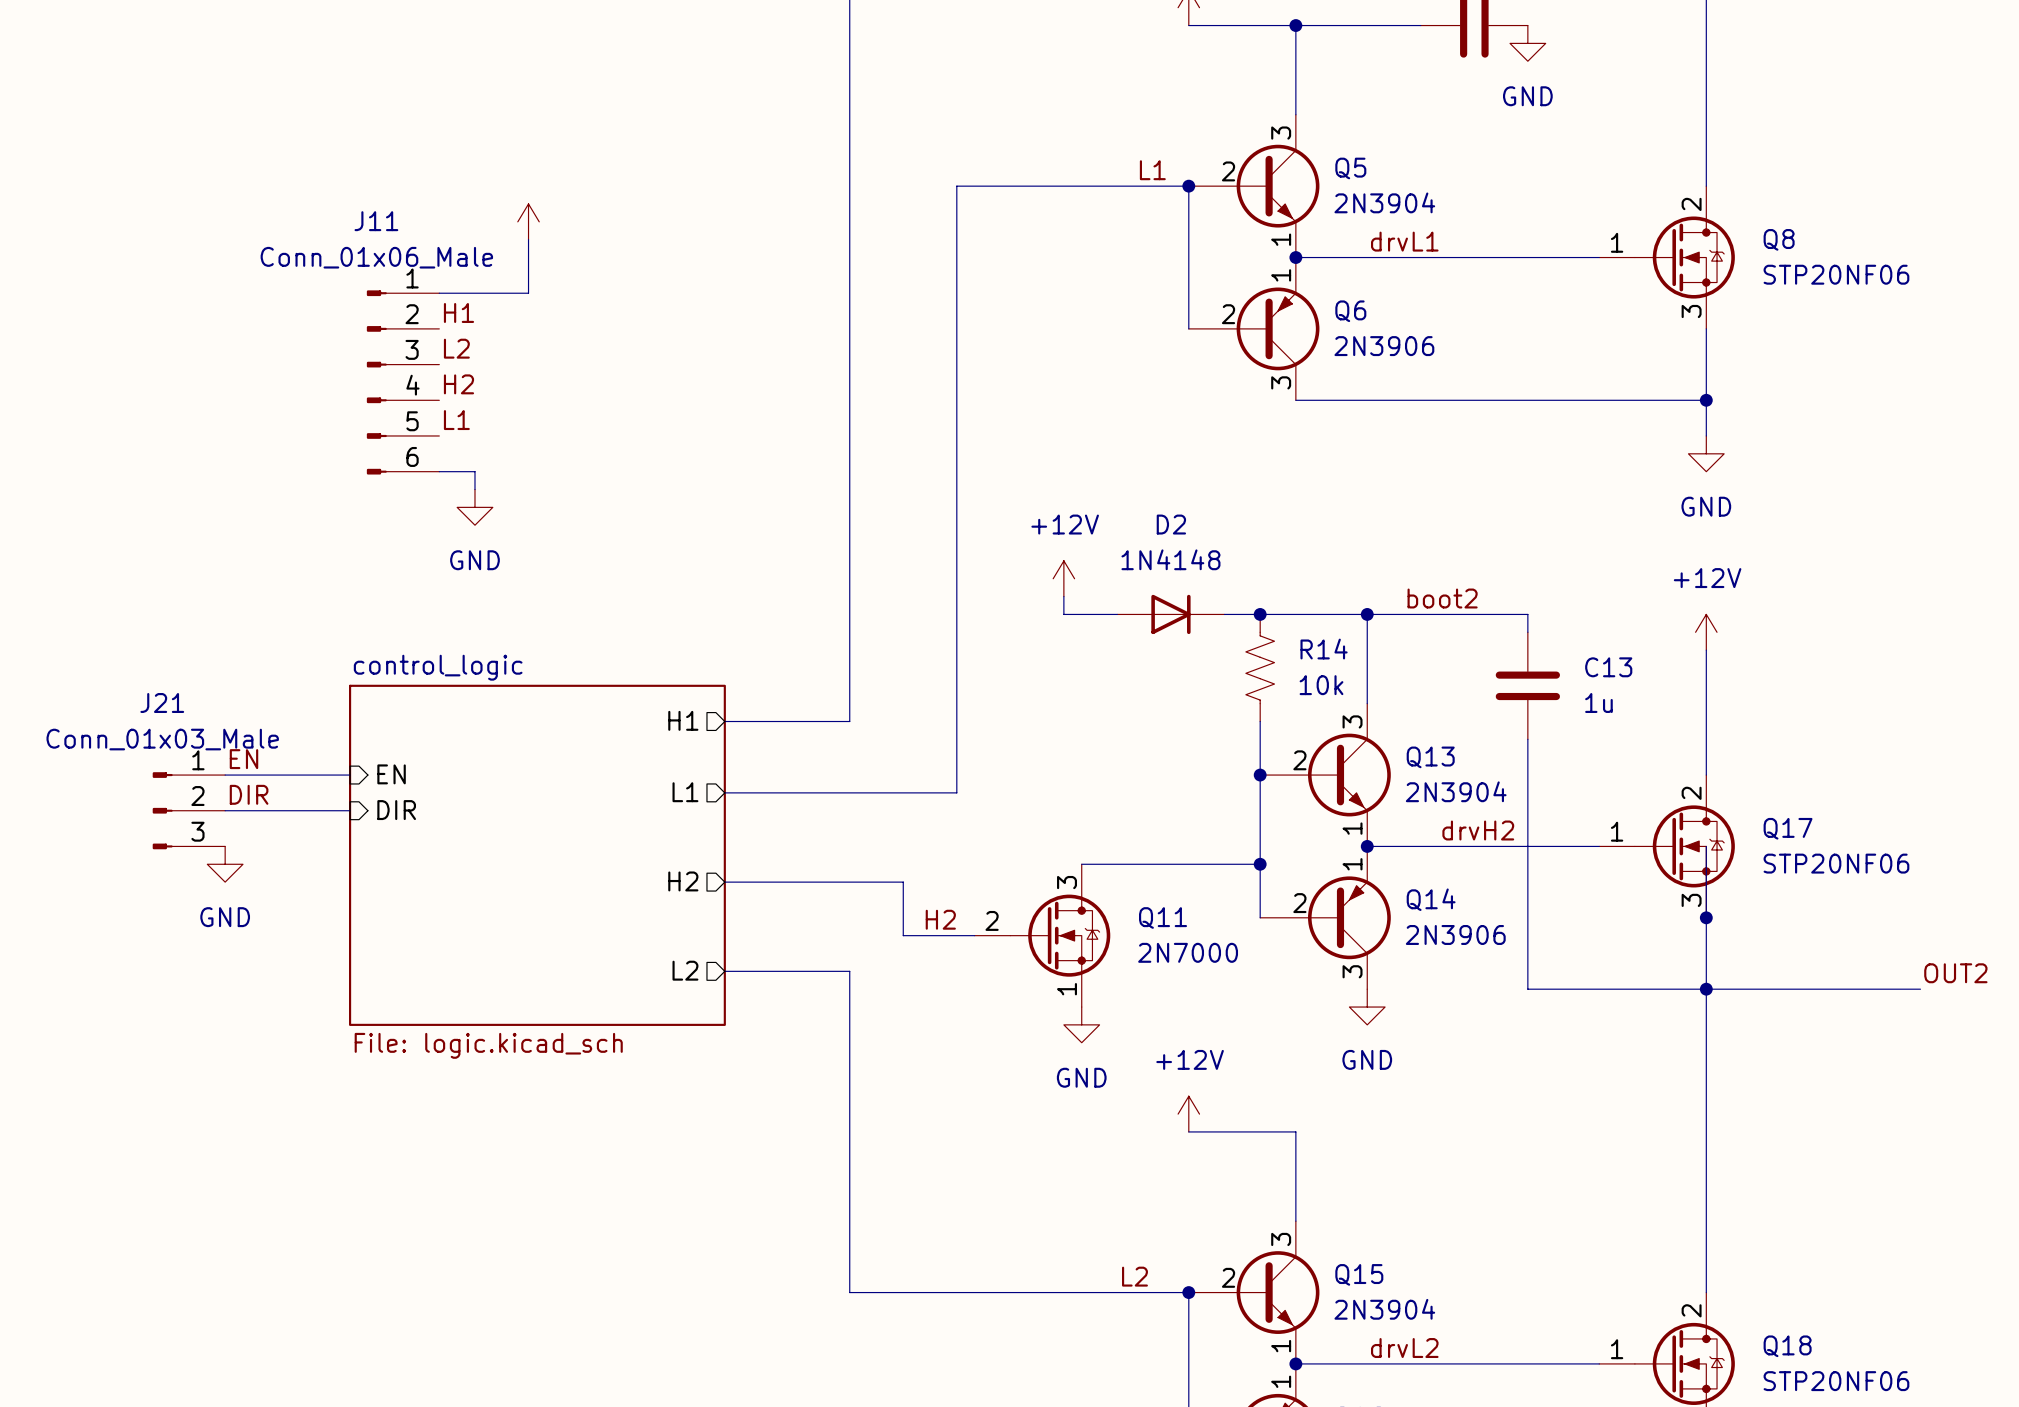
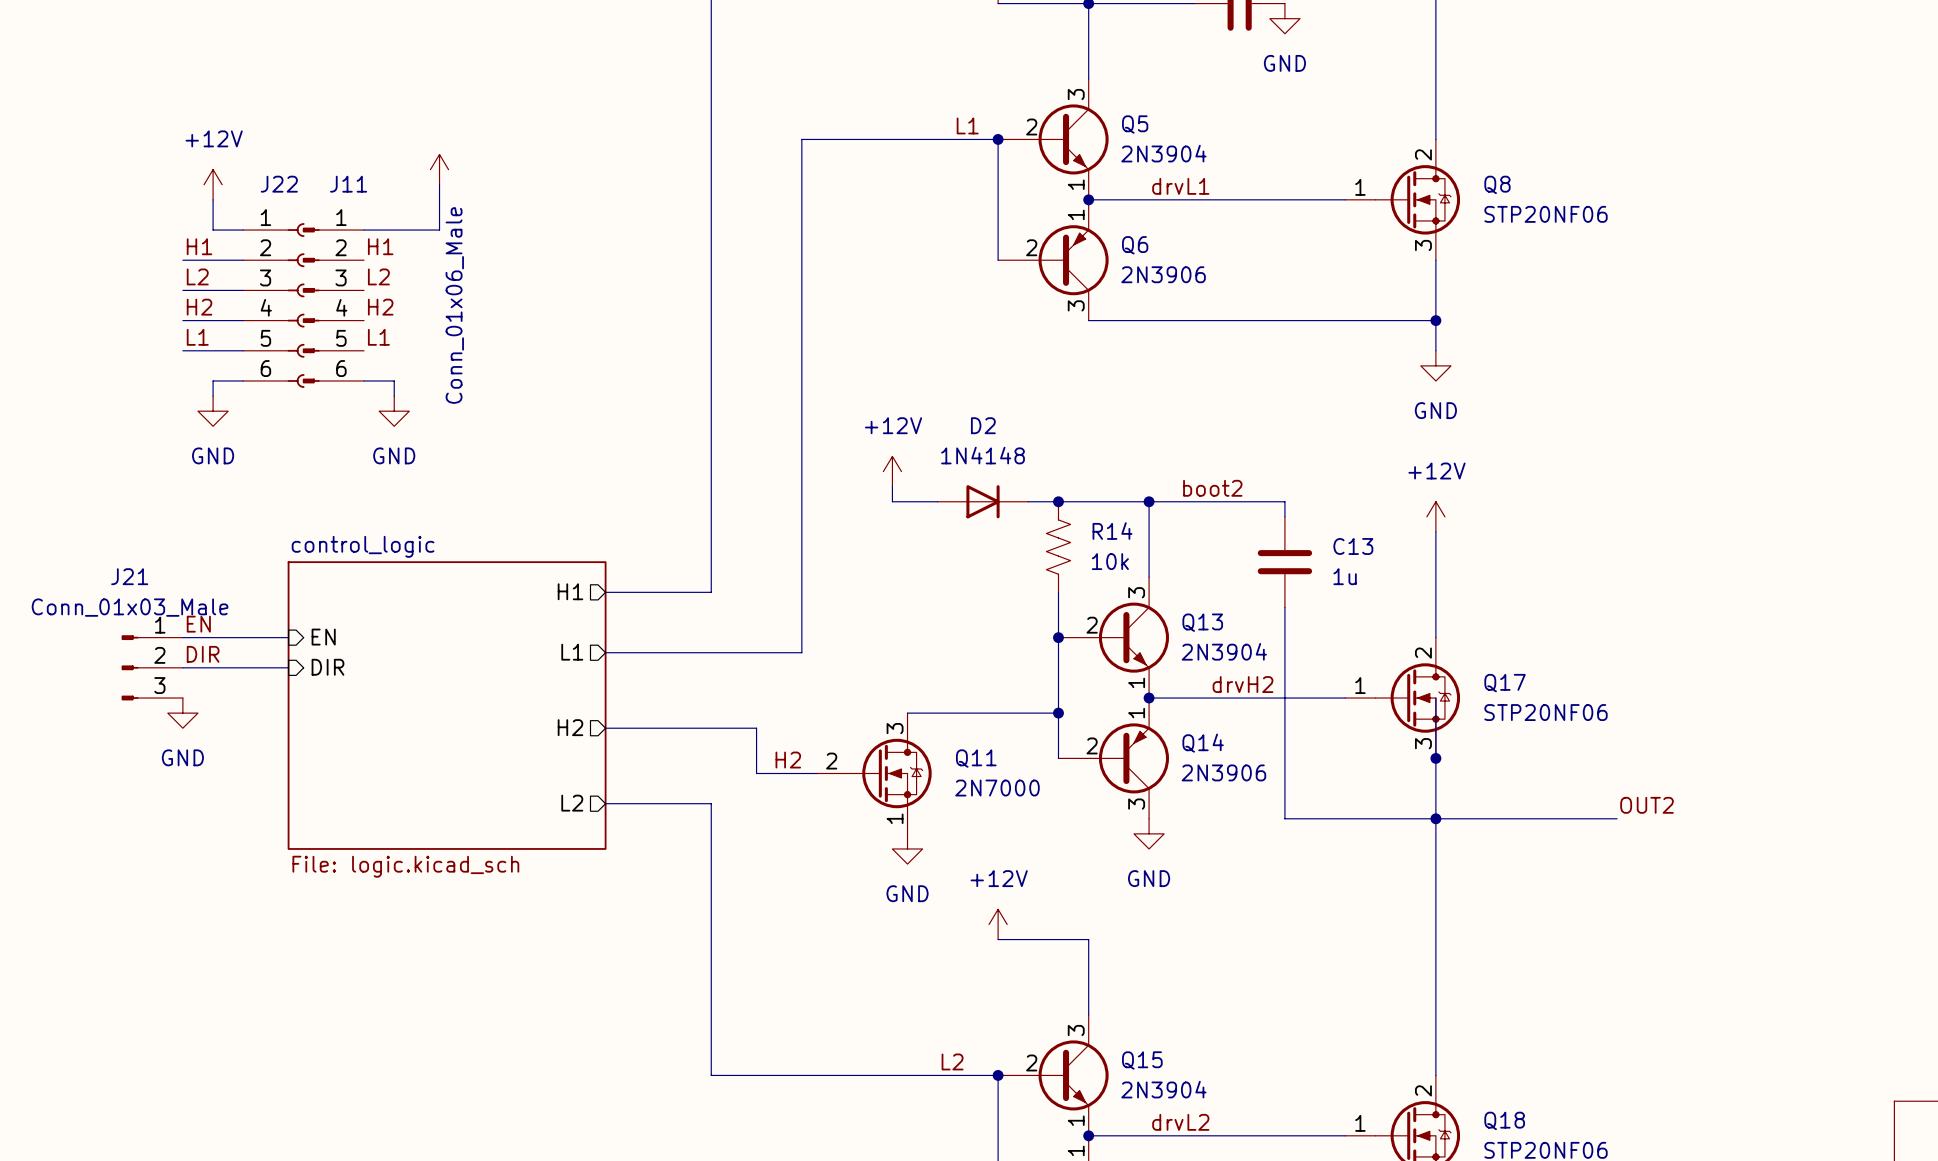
J11 name position: J11 (376, 221) -> J11 (348, 184)
power symbol: none -> +12V (213, 184)
wire: none -> (213, 199) (213, 230) (243, 230)
J11 value rotation: 0° (376, 257) -> 90° counterclockwise (454, 305)
label: none -> H1 (199, 246)
wire: none -> (182, 260) (243, 260)
label: none -> L2 (197, 276)
wire: none -> (182, 290) (243, 290)
J22: none -> (273, 305)
label: none -> H2 (199, 307)
wire: none -> (182, 320) (243, 320)
label: none -> L1 (197, 337)
wire: none -> (182, 350) (243, 350)
wire: none -> (243, 380) (213, 380) (213, 396)
power symbol: none -> GND (213, 411)

